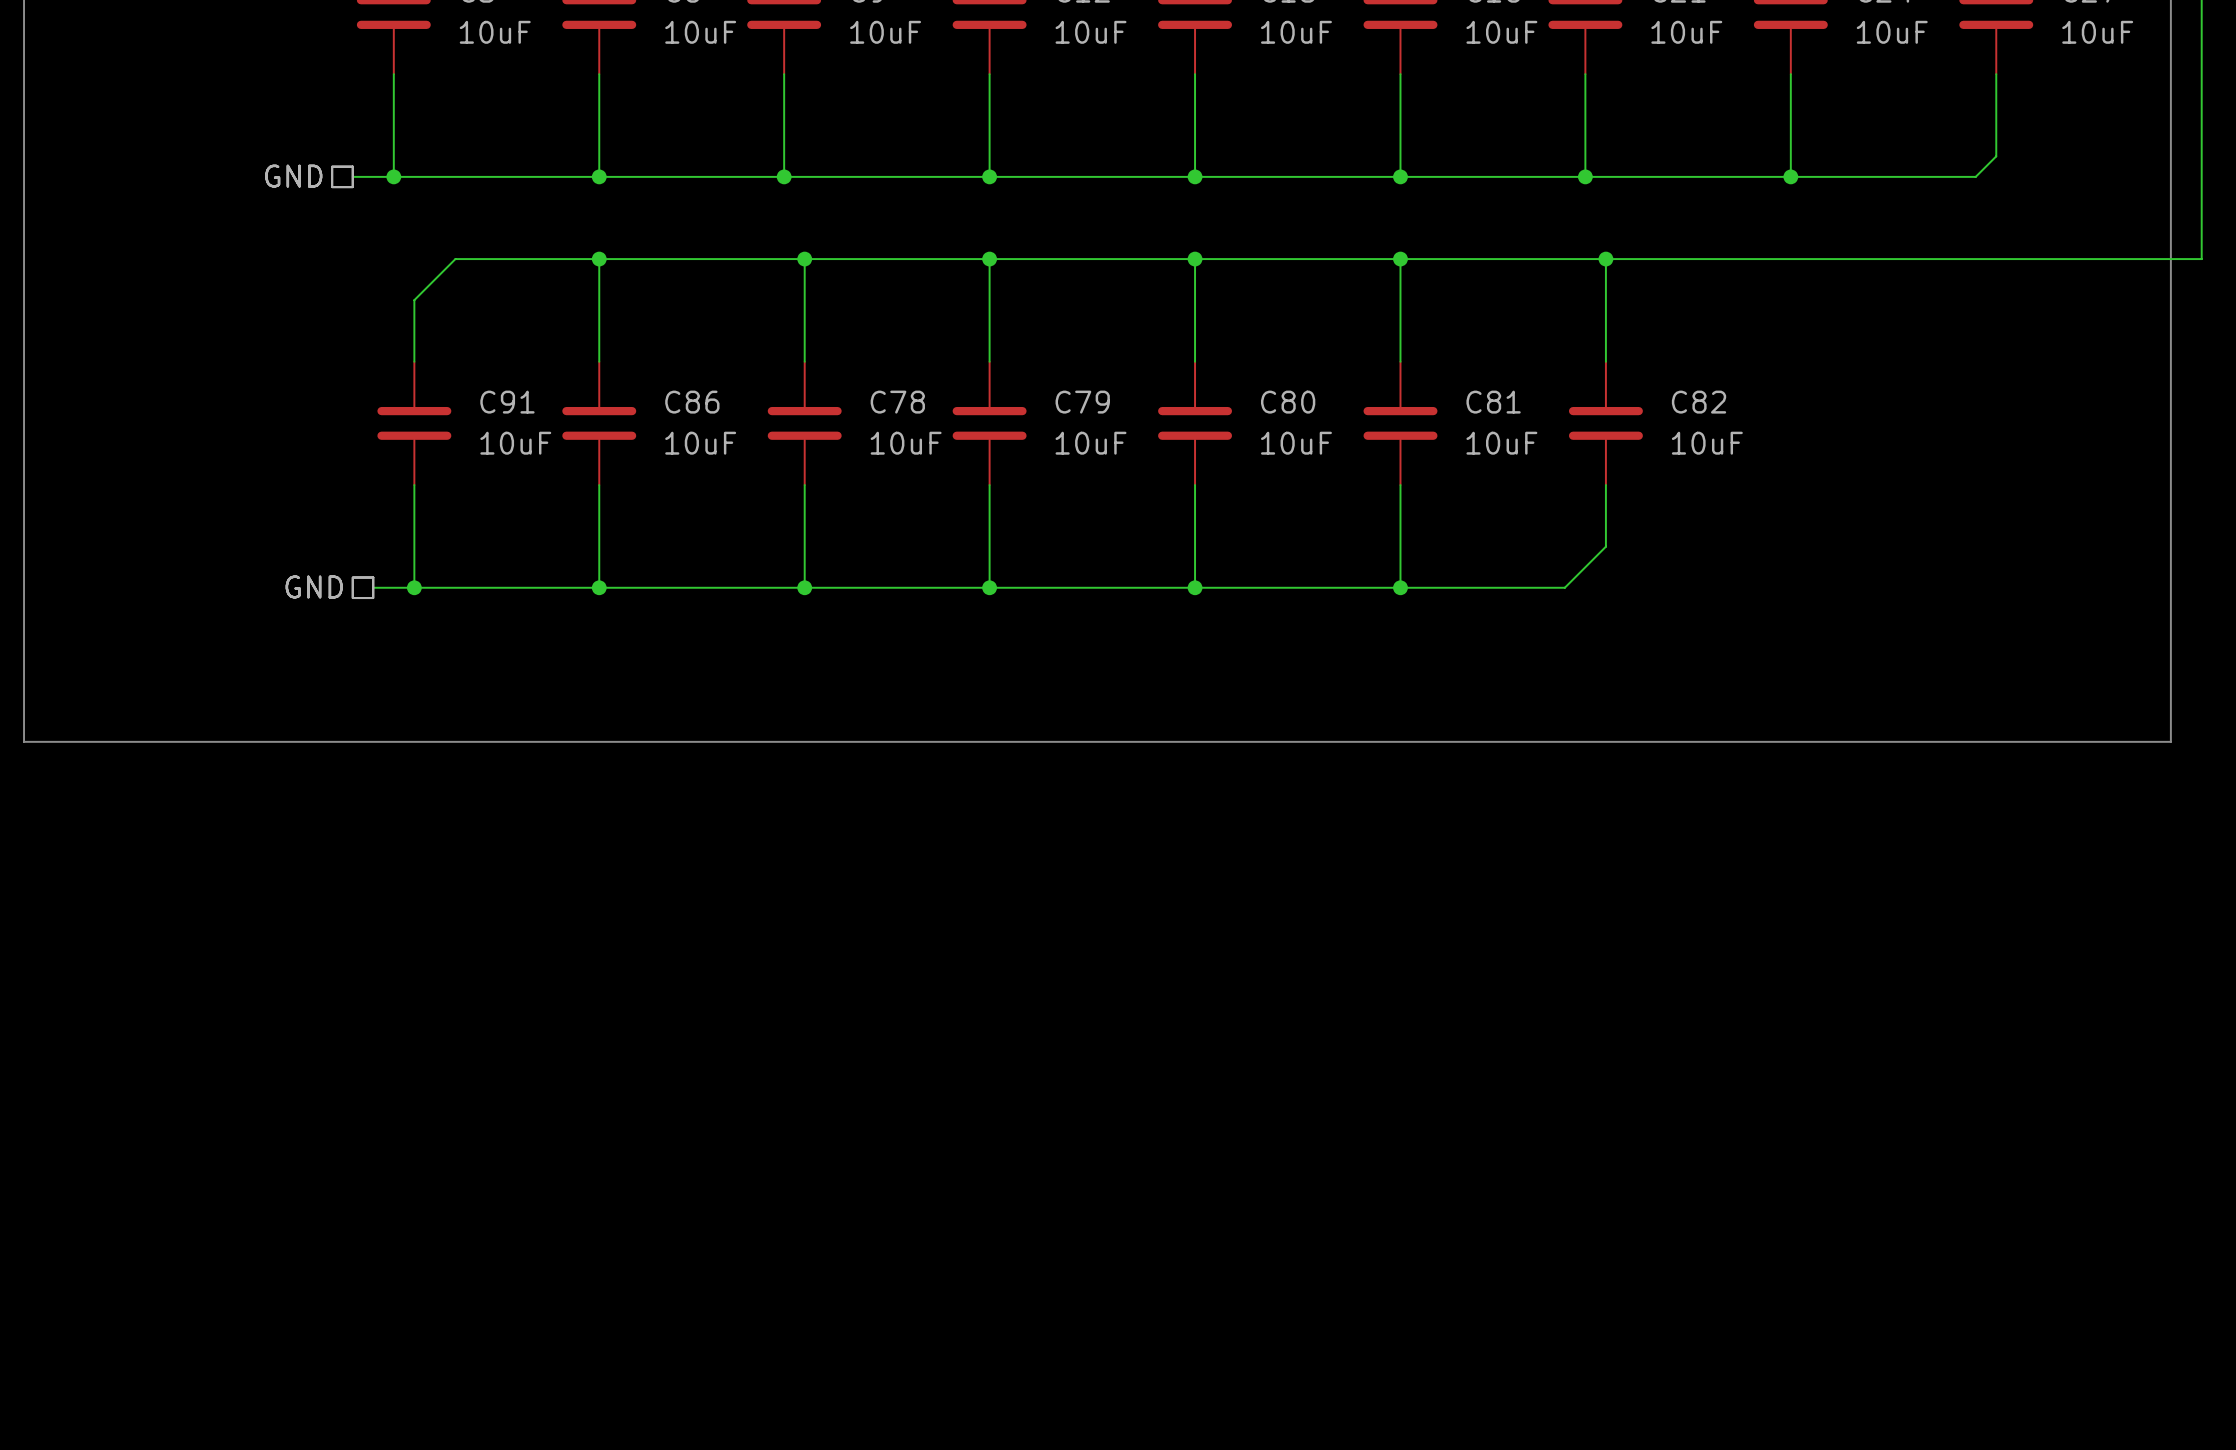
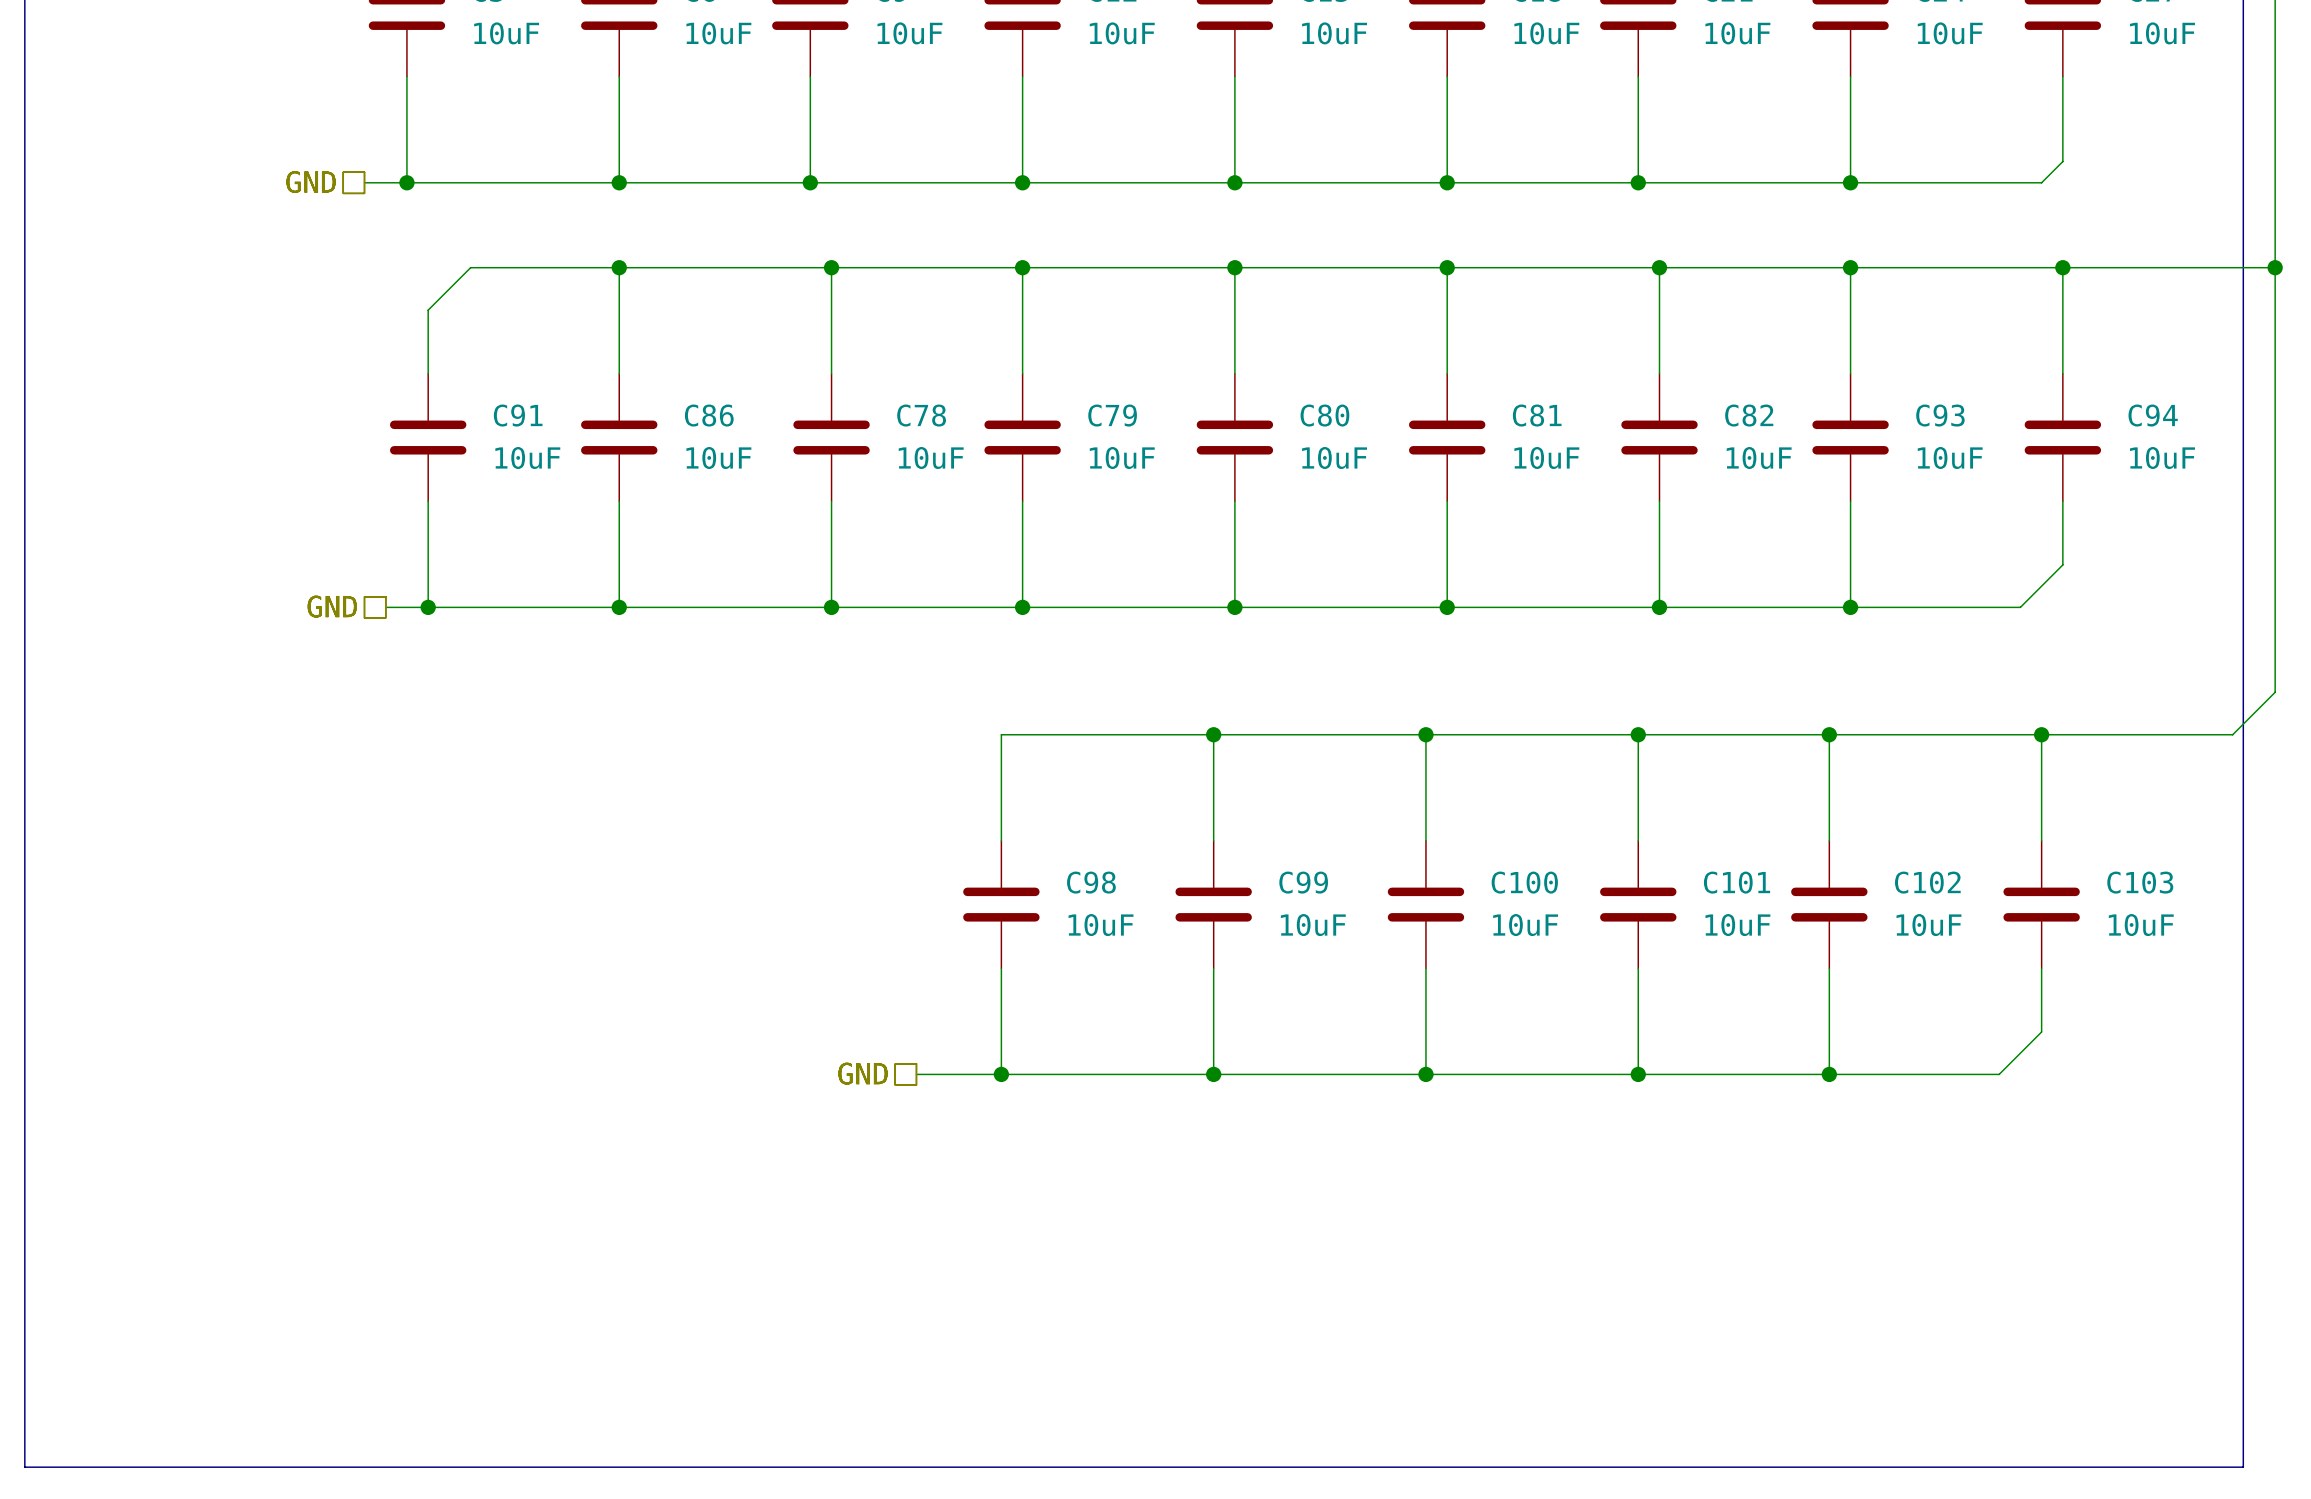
wire: none -> (1850, 267) (1850, 373)
junction: none -> (1850, 267)
wire: none -> (2062, 267) (2062, 373)
junction: none -> (2062, 267)
wire: none -> (2275, 267) (2275, 692) (2232, 734) (1001, 734) (1001, 840)
junction: none -> (2275, 267)
C93: none -> 10uF (1850, 437)
C94: none -> 10uF (2062, 437)
wire: none -> (1850, 501) (1850, 607)
wire: none -> (2062, 501) (2062, 564) (2020, 607) (1617, 607)
wire: (1605, 546) (1564, 587) -> (1659, 564) (1659, 607)
junction: none -> (1659, 607)
junction: none -> (1850, 607)
wire: none -> (1213, 734) (1213, 840)
junction: none -> (1213, 734)
wire: none -> (1425, 734) (1425, 840)
junction: none -> (1425, 734)
wire: none -> (1638, 734) (1638, 840)
junction: none -> (1638, 734)
wire: none -> (1829, 734) (1829, 840)
junction: none -> (1829, 734)
wire: none -> (2041, 734) (2041, 840)
junction: none -> (2041, 734)
line: (24, 741) (2170, 741) -> (24, 766) (24, 1467) (2243, 1467) (2243, 766)
C98: none -> 10uF (1001, 904)
C99: none -> 10uF (1213, 904)
C100: none -> 10uF (1425, 904)
C101: none -> 10uF (1638, 904)
C102: none -> 10uF (1829, 904)
C103: none -> 10uF (2041, 904)
wire: none -> (1001, 968) (1001, 1074)
wire: none -> (1213, 968) (1213, 1074)
wire: none -> (1425, 968) (1425, 1074)
wire: none -> (1638, 968) (1638, 1074)
wire: none -> (1829, 968) (1829, 1074)
wire: none -> (2041, 968) (2041, 1031) (1999, 1074) (916, 1074)
hierarchical label: none -> GND (863, 1073)
junction: none -> (1001, 1074)
junction: none -> (1213, 1074)
junction: none -> (1425, 1074)
junction: none -> (1638, 1074)
junction: none -> (1829, 1074)

